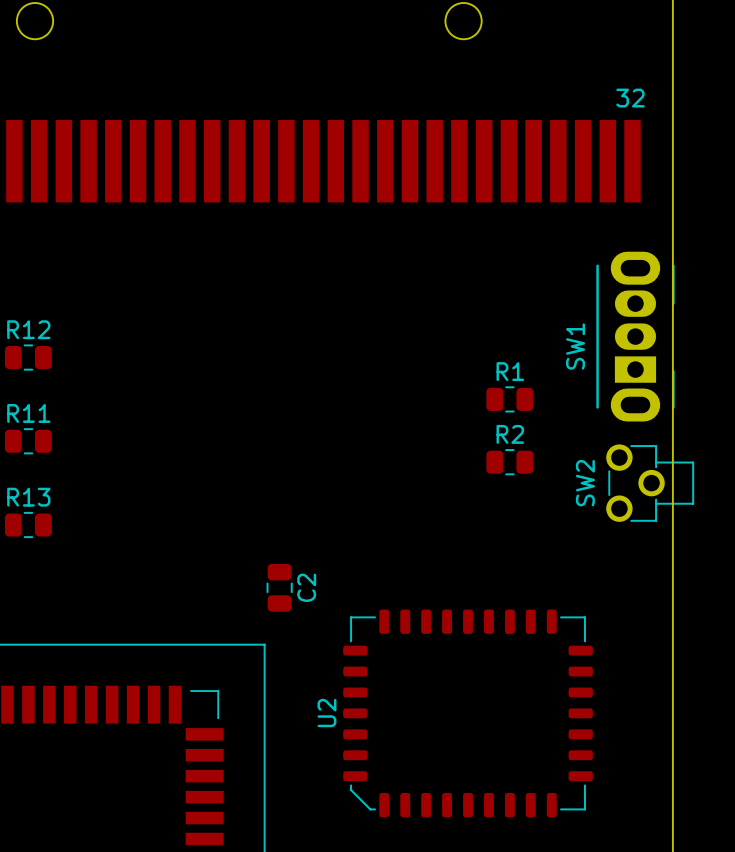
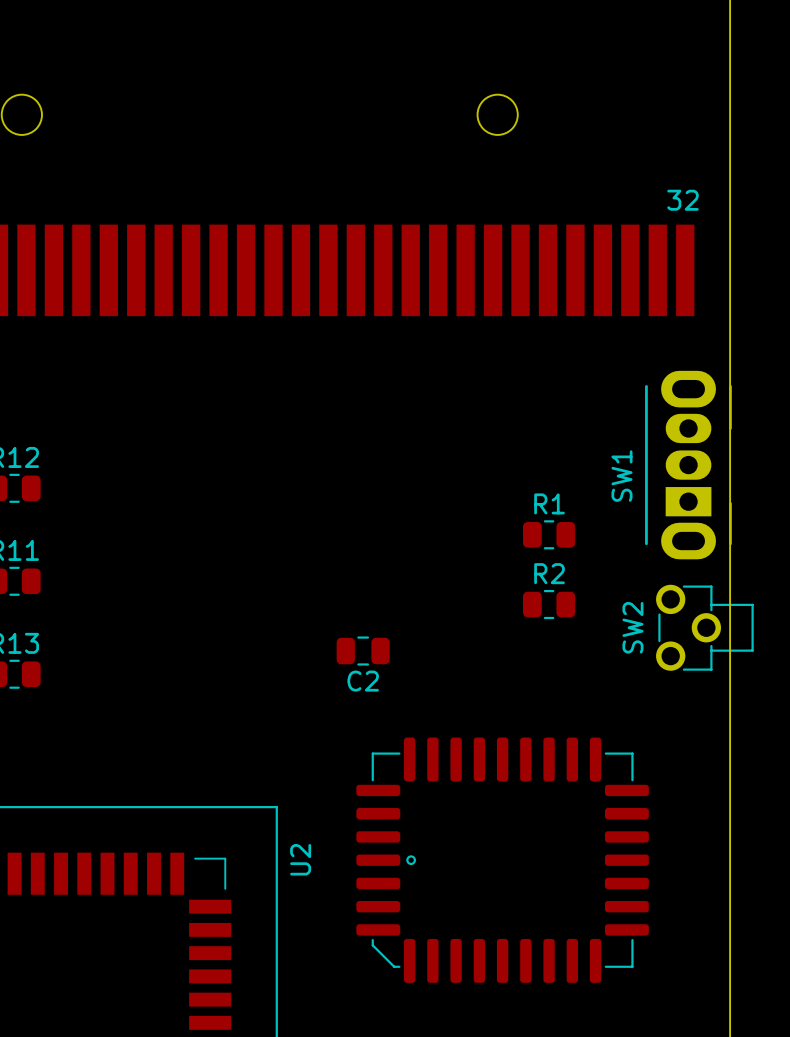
C2 rotation: 0° (279, 587) -> 90° clockwise (363, 651)
C2 position: (279, 587) -> (363, 651)
U2 footprint: [343, 609, 593, 818] -> [356, 737, 649, 983]
U2 name position: U2 (326, 713) -> U2 (300, 859)

